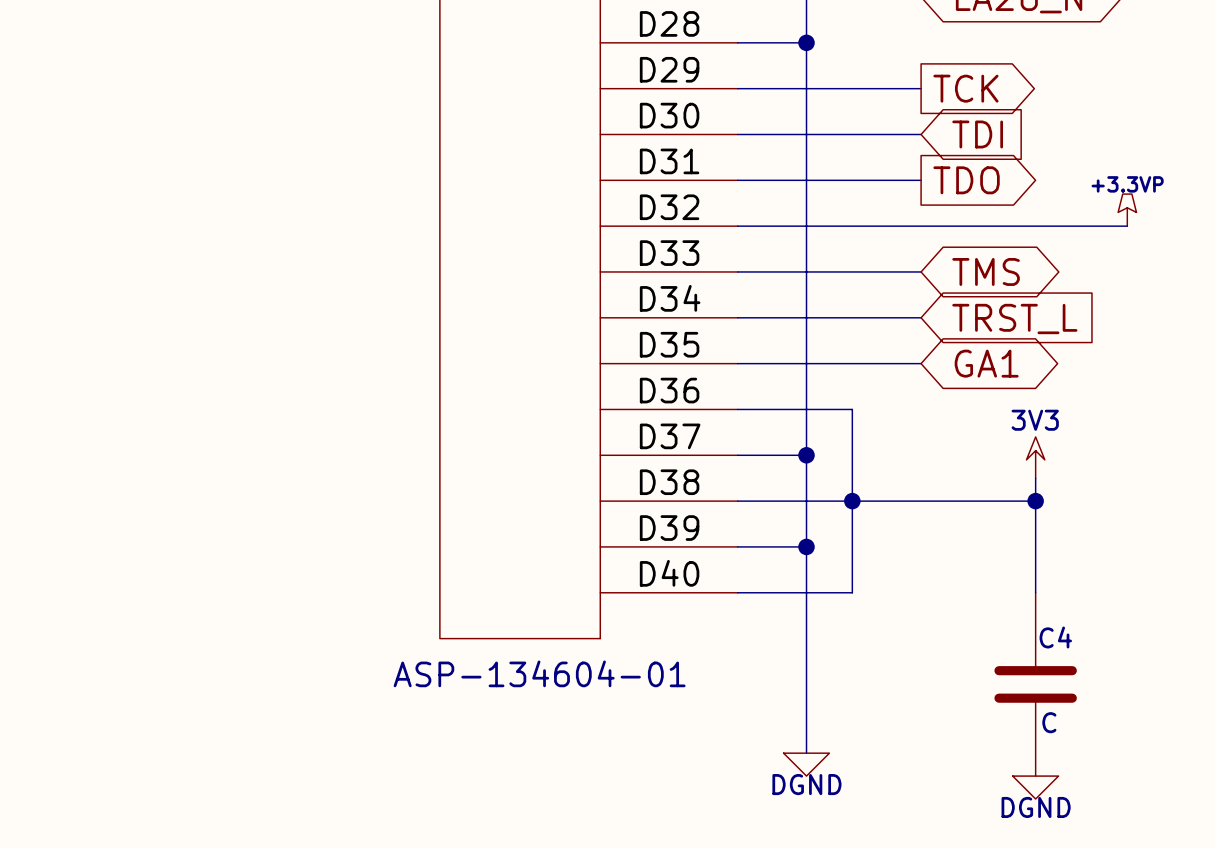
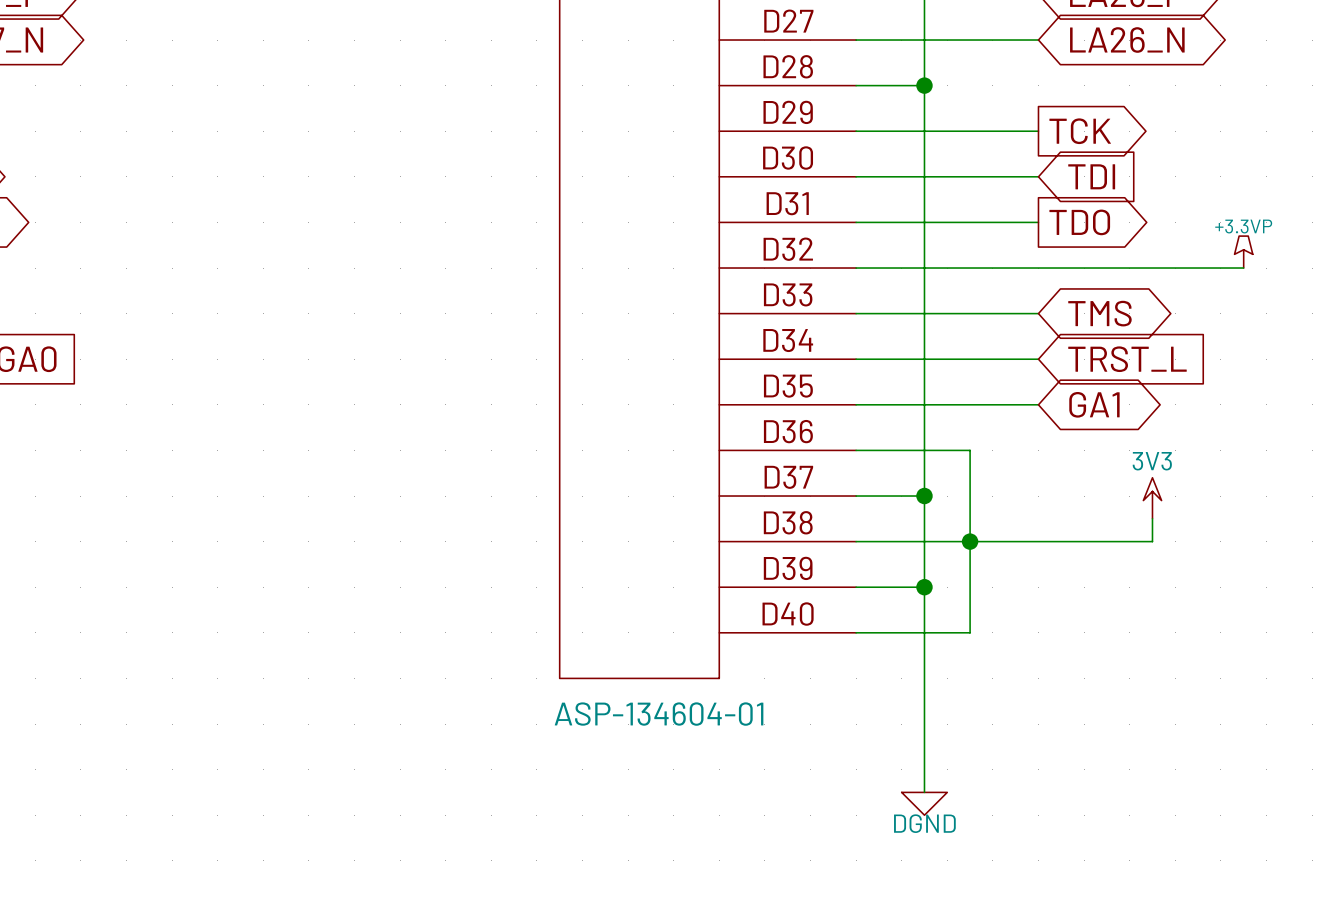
wire: (1035, 501) (1035, 592) -> none
junction: (1035, 501) -> none
C4: C (1035, 684) -> none
power symbol: DGND (1035, 787) -> none

